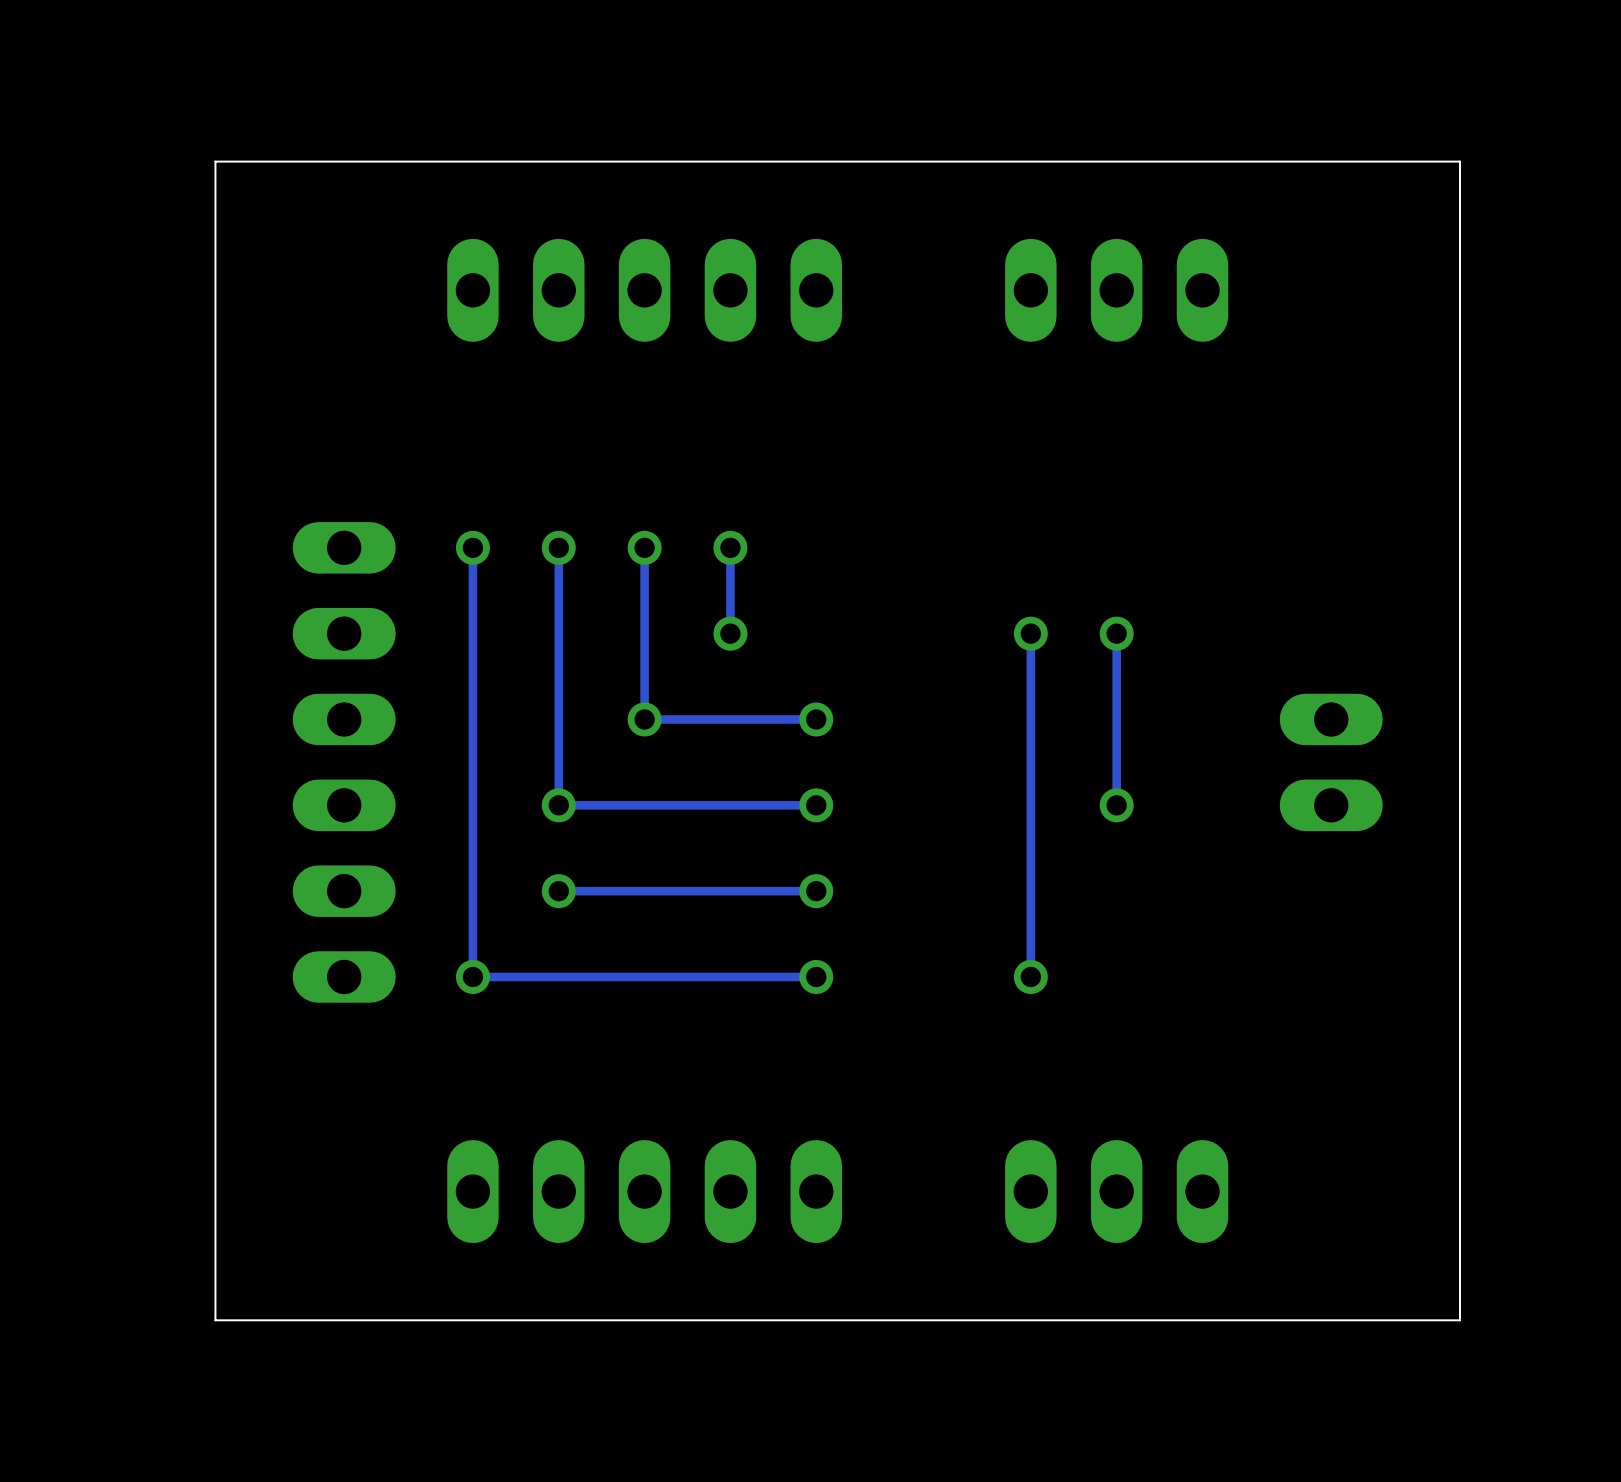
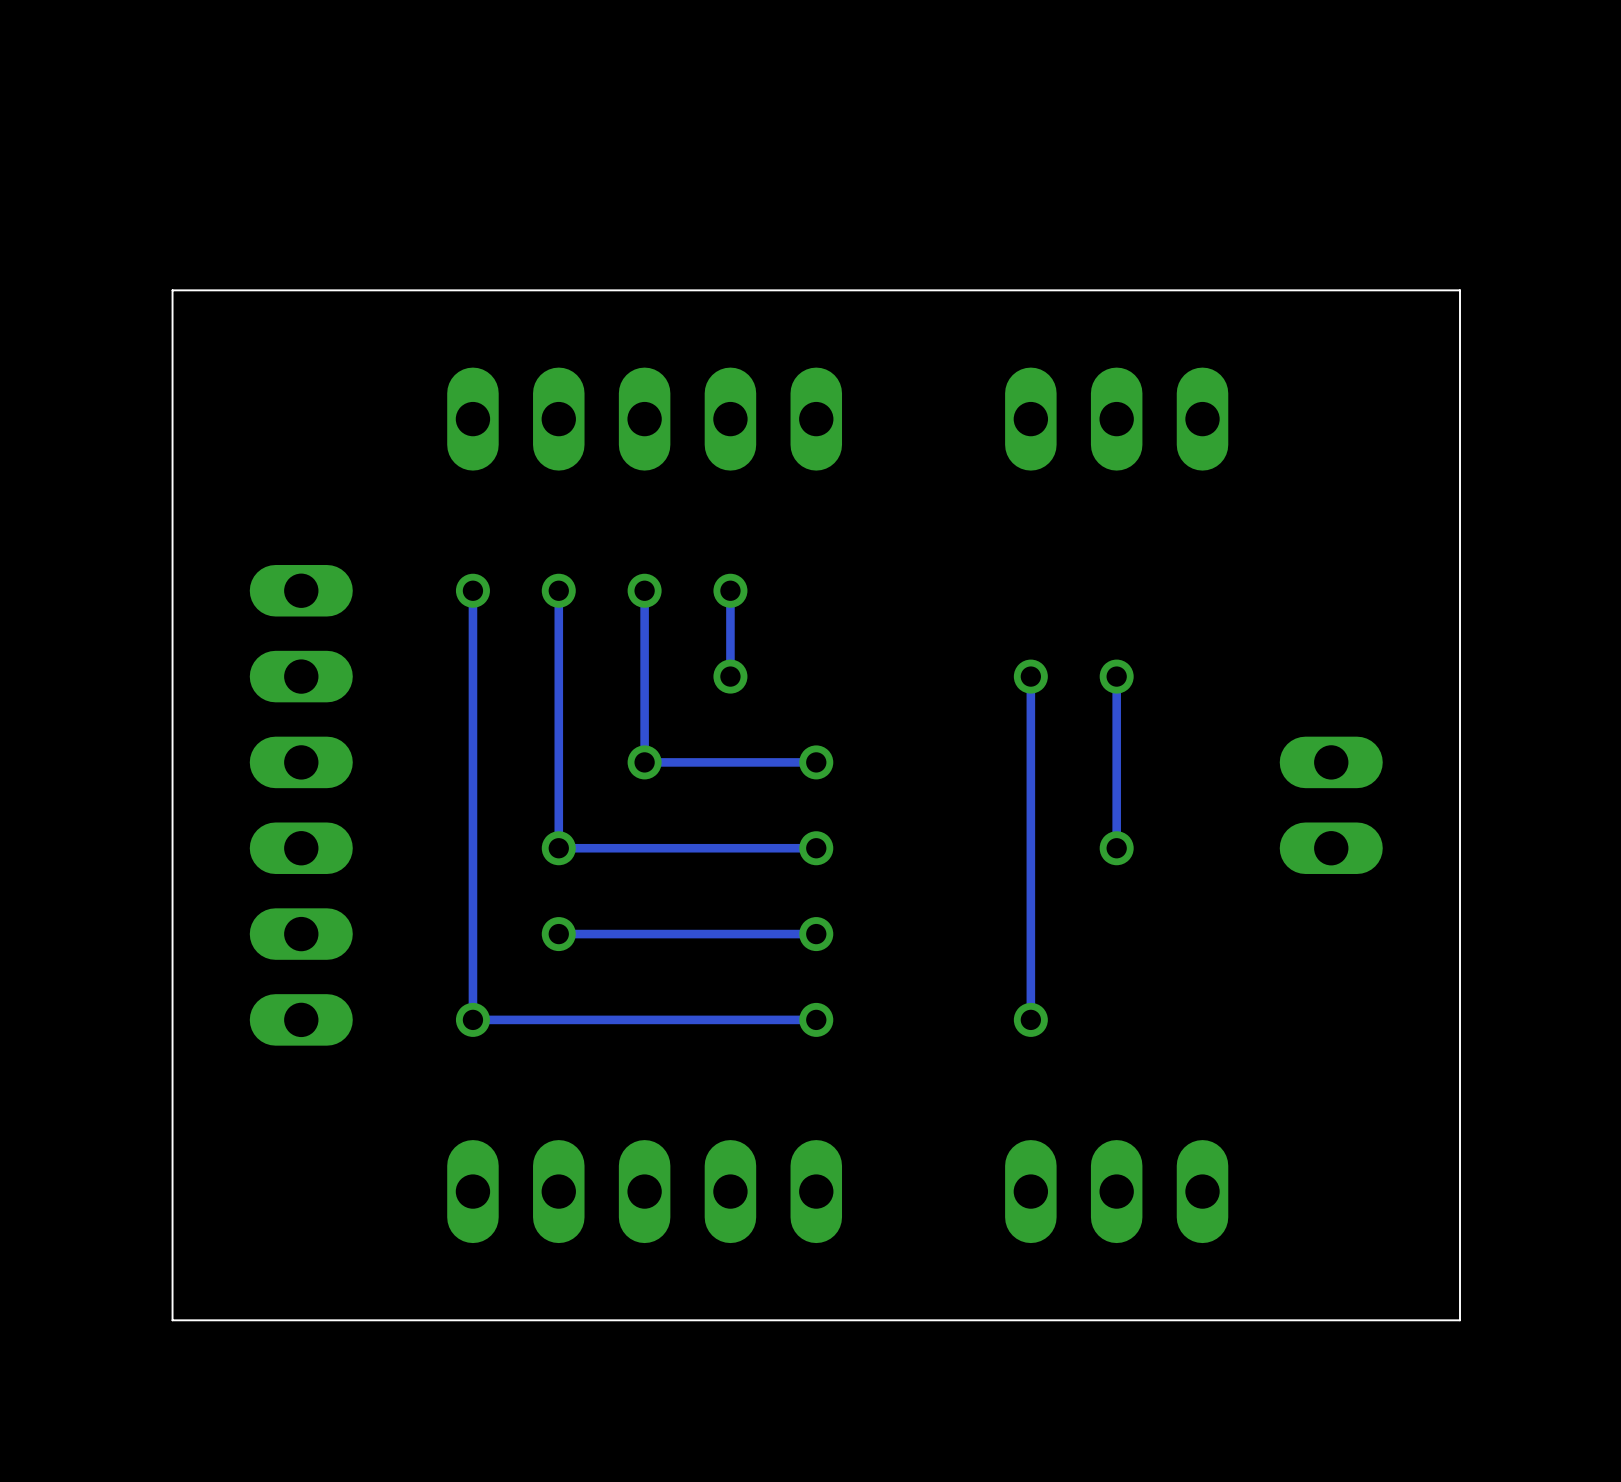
part position: (644, 290) -> (644, 419)
part position: (1116, 290) -> (1116, 419)
board edge: (1460, 290) (1460, 161) (215, 161) (215, 1320) -> (1460, 290) (172, 290) (172, 1320) (215, 1320)
track: (472, 547) (472, 590) -> none
via position: (472, 547) -> (472, 590)
track: (558, 547) (558, 590) -> none
via position: (558, 547) -> (558, 590)
track: (644, 547) (644, 590) -> none
via position: (644, 547) -> (644, 590)
track: (730, 547) (730, 590) -> (730, 633) (730, 676)
via: (730, 547) -> none
via: none -> (730, 590)
via: (730, 633) -> none
track: (1030, 633) (1030, 676) -> (1030, 976) (1030, 1019)
via position: (1030, 633) -> (1030, 676)
track: (1116, 633) (1116, 676) -> (1116, 805) (1116, 848)
via position: (1116, 633) -> (1116, 676)
via: none -> (730, 676)
via position: (644, 719) -> (644, 762)
track: (816, 719) (644, 719) -> (816, 762) (644, 762) (644, 719)
via: (816, 719) -> none
part position: (344, 762) -> (301, 805)
via: none -> (816, 762)
part position: (1331, 762) -> (1331, 805)
via: (558, 805) -> none
track: (816, 805) (558, 805) -> (816, 848) (558, 848) (558, 805)
via: (816, 805) -> none
via position: (1116, 805) -> (1116, 848)
via: none -> (558, 848)
via: none -> (816, 848)
via: (558, 891) -> none
track: (816, 891) (558, 891) -> (816, 934) (558, 934)
via: (816, 891) -> none
via: none -> (558, 934)
via: none -> (816, 934)
via position: (472, 976) -> (472, 1019)
track: (816, 976) (472, 976) -> (816, 1019) (472, 1019) (472, 976)
via: (816, 976) -> none
via position: (1030, 976) -> (1030, 1019)
via: none -> (816, 1019)

